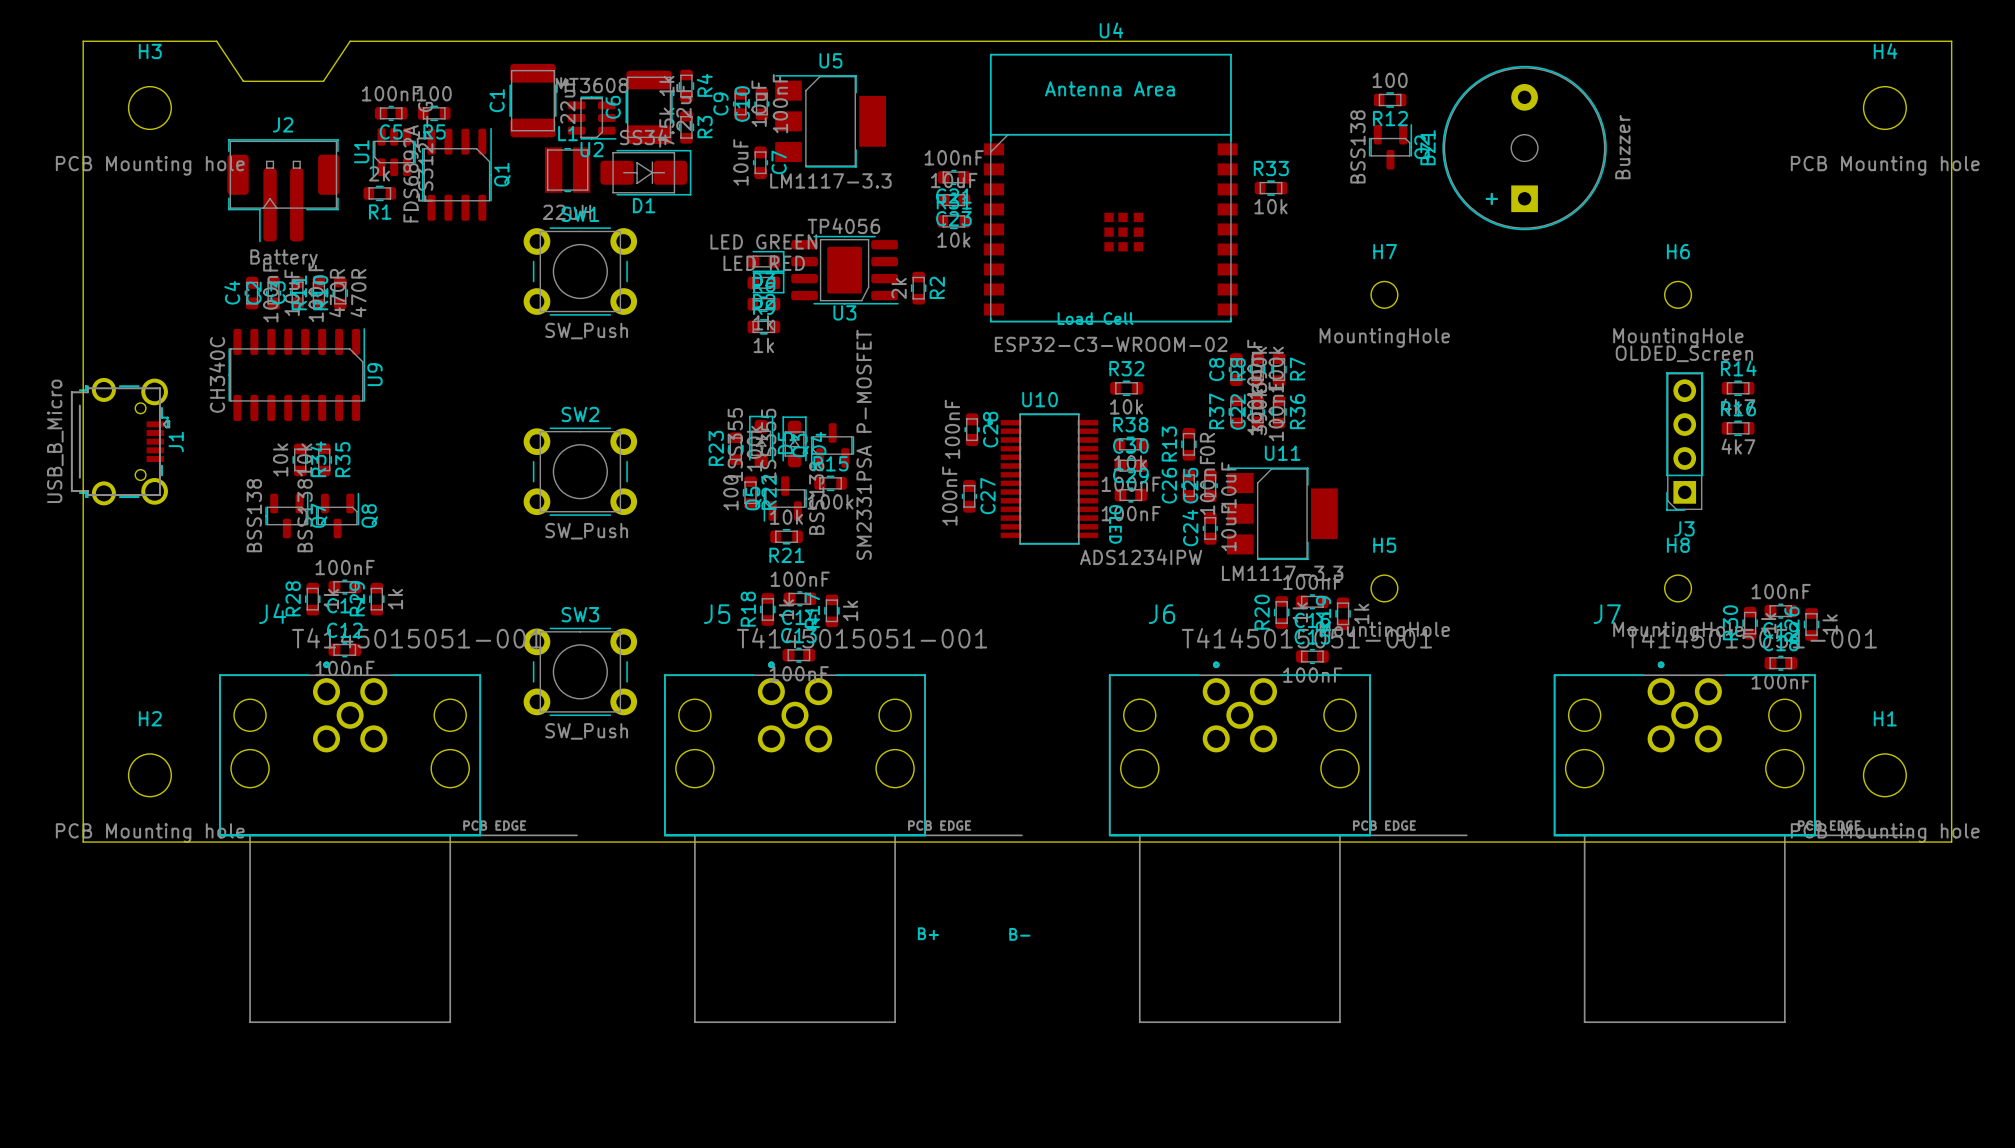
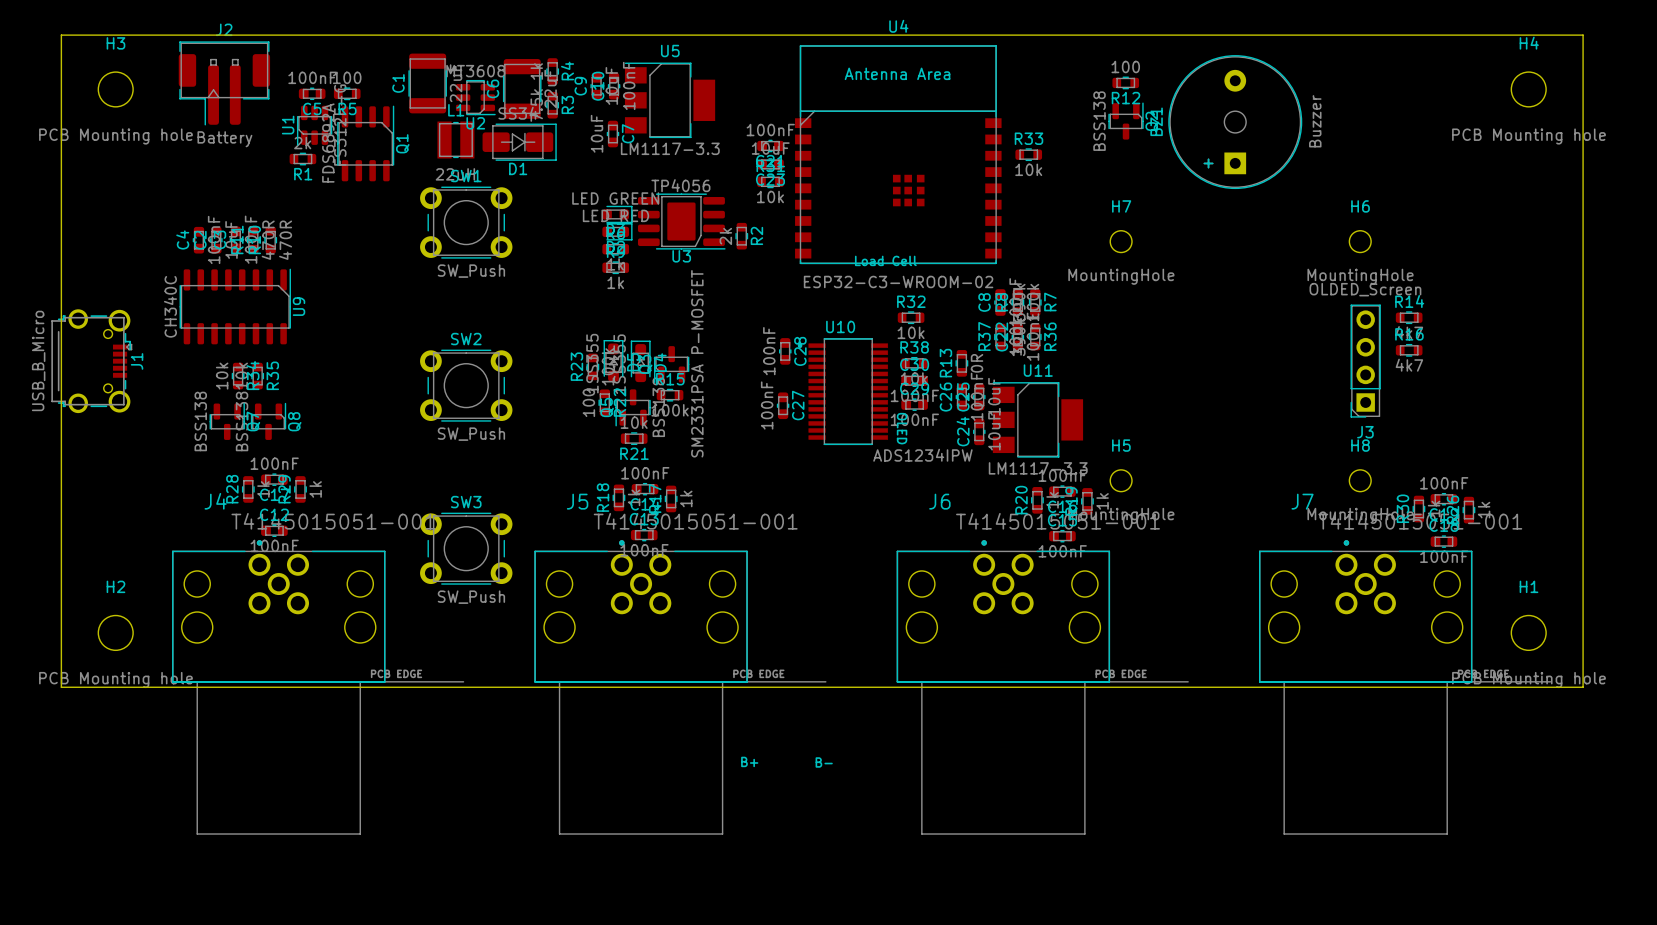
board edge: (216, 41) (243, 81) (323, 81) (350, 41) -> (170, 35) (278, 35)
J2 position: (283, 190) -> (224, 83)

